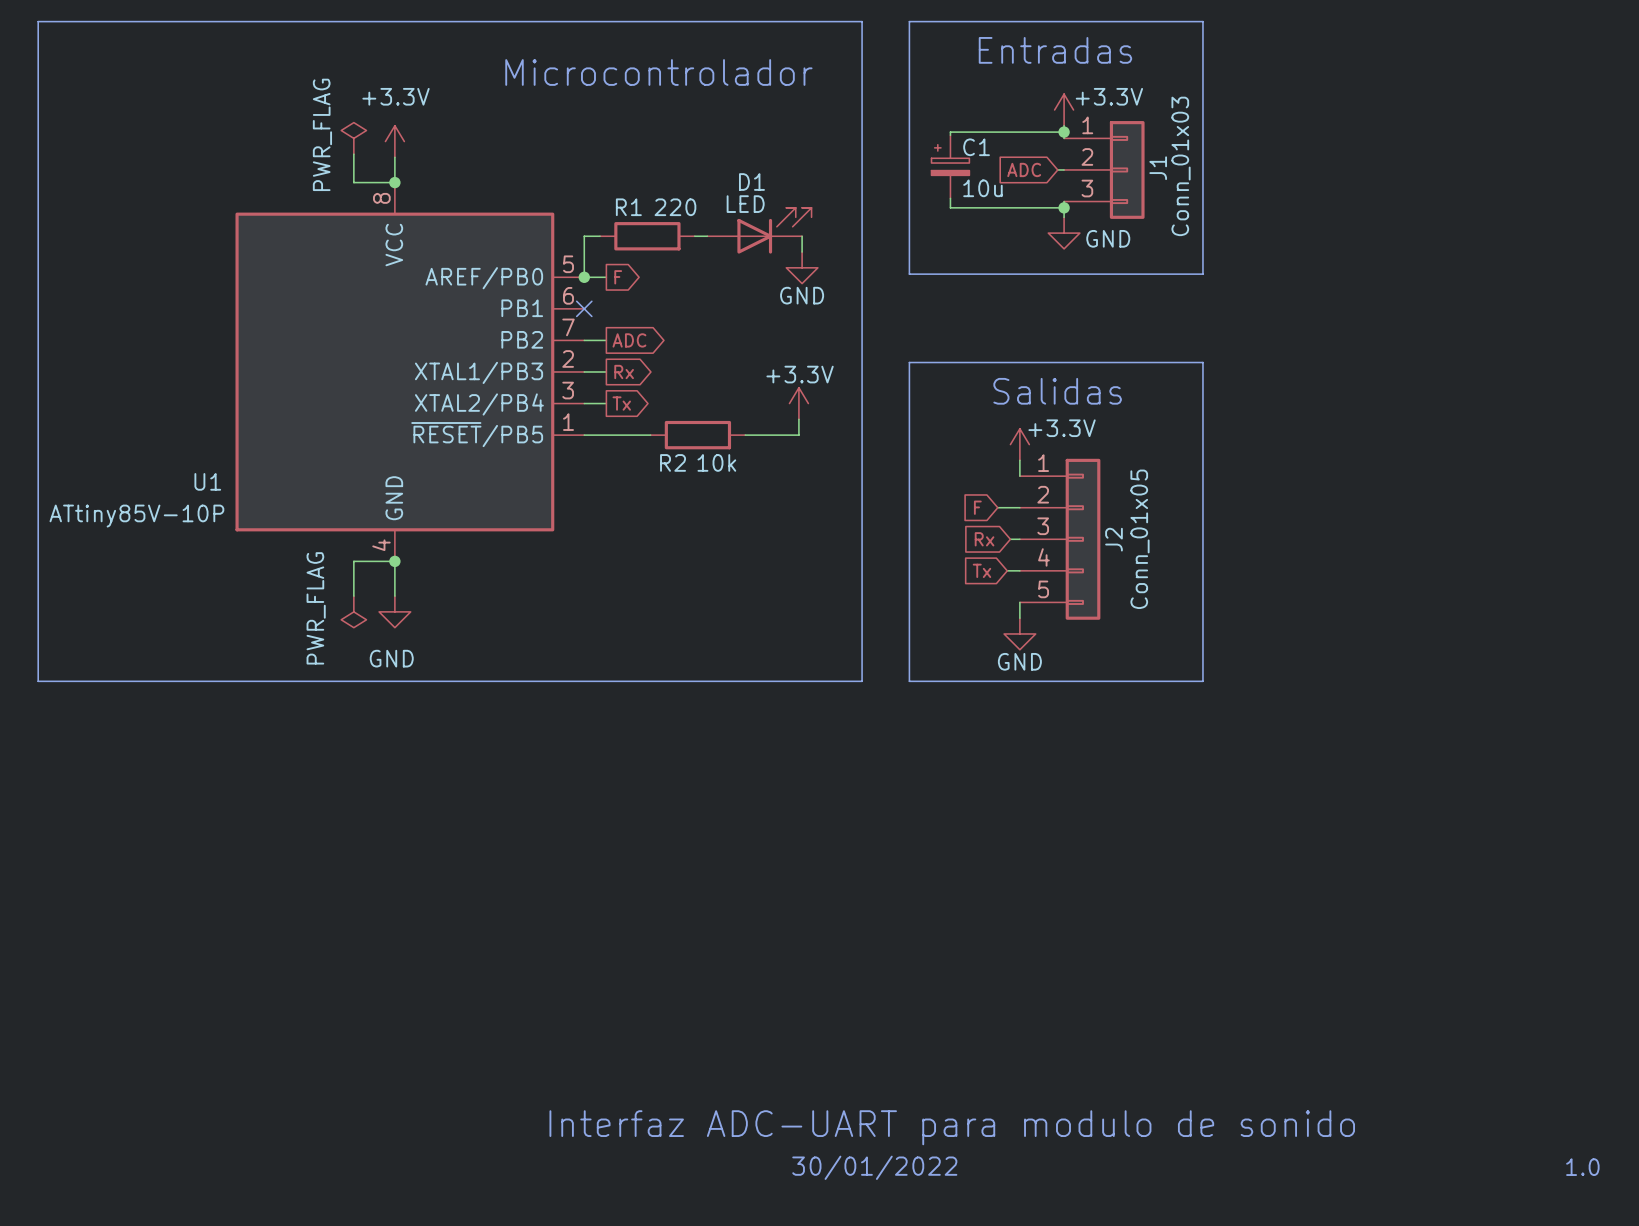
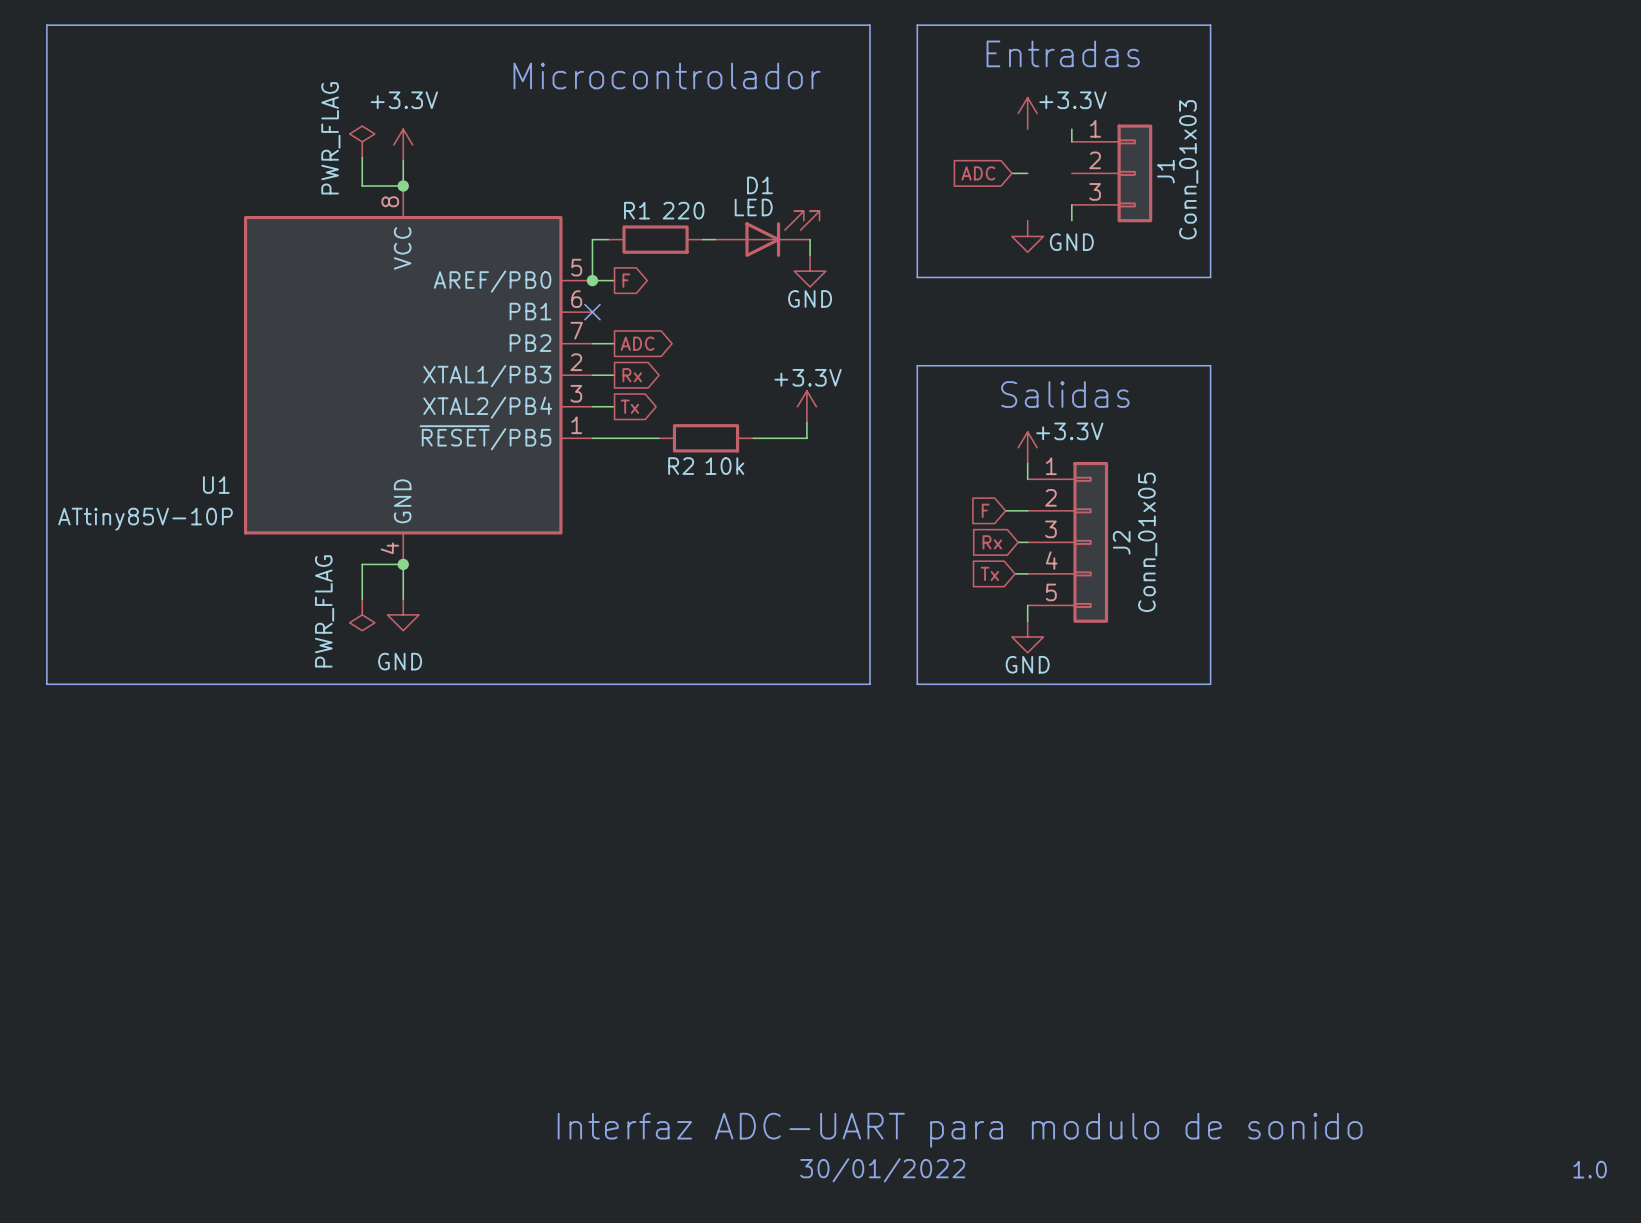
power symbol position: +3.3V (1064, 109) -> +3.3V (1027, 113)
wire: (1064, 132) (950, 132) (950, 135) -> none
junction: (1064, 132) -> none
C1: 10u (950, 166) -> none
wire: none -> (1011, 173) (1027, 173)
global label position: ADC (1024, 169) -> ADC (978, 173)
wire: (1057, 169) (1064, 169) -> none
wire: (950, 198) (950, 207) (1064, 207) -> none
junction: (1064, 207) -> none
power symbol position: GND (1064, 233) -> GND (1027, 236)

